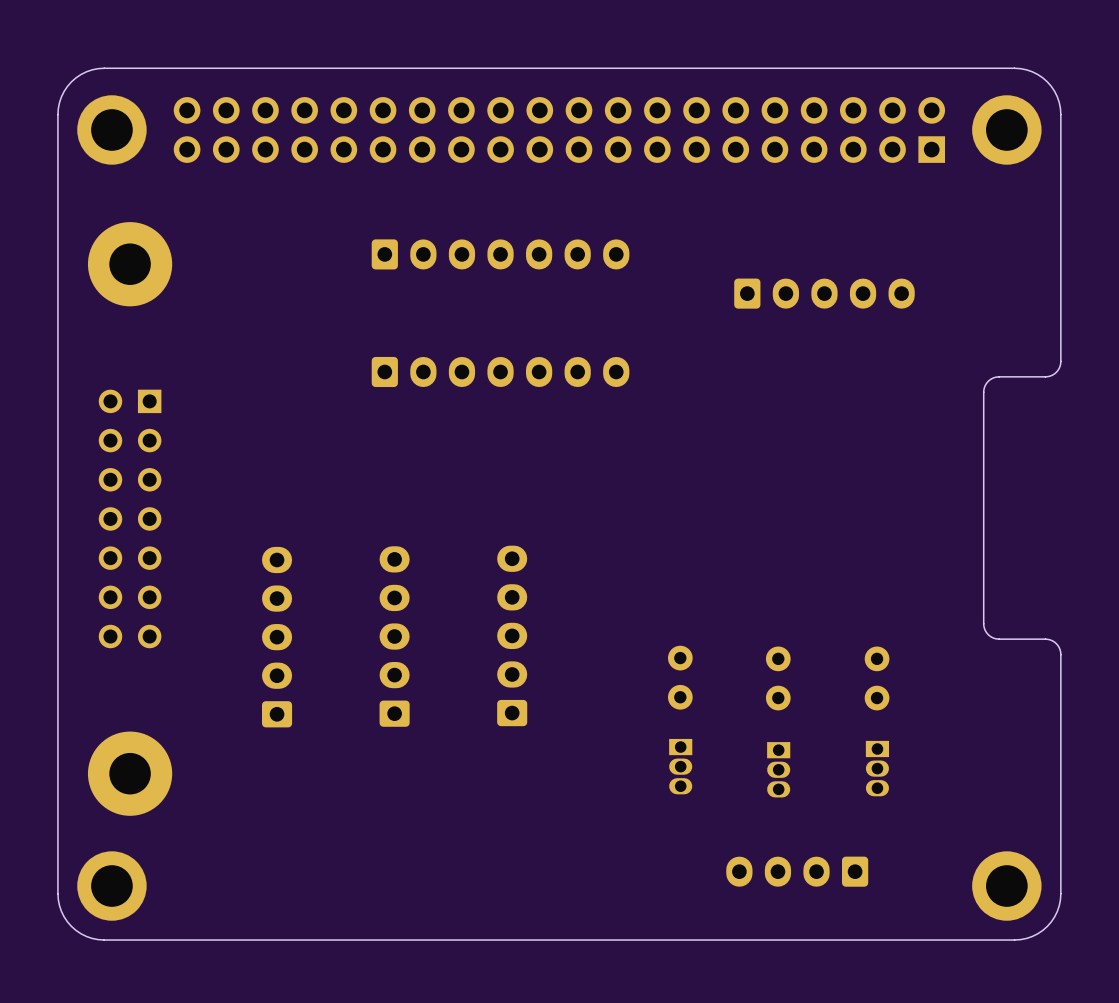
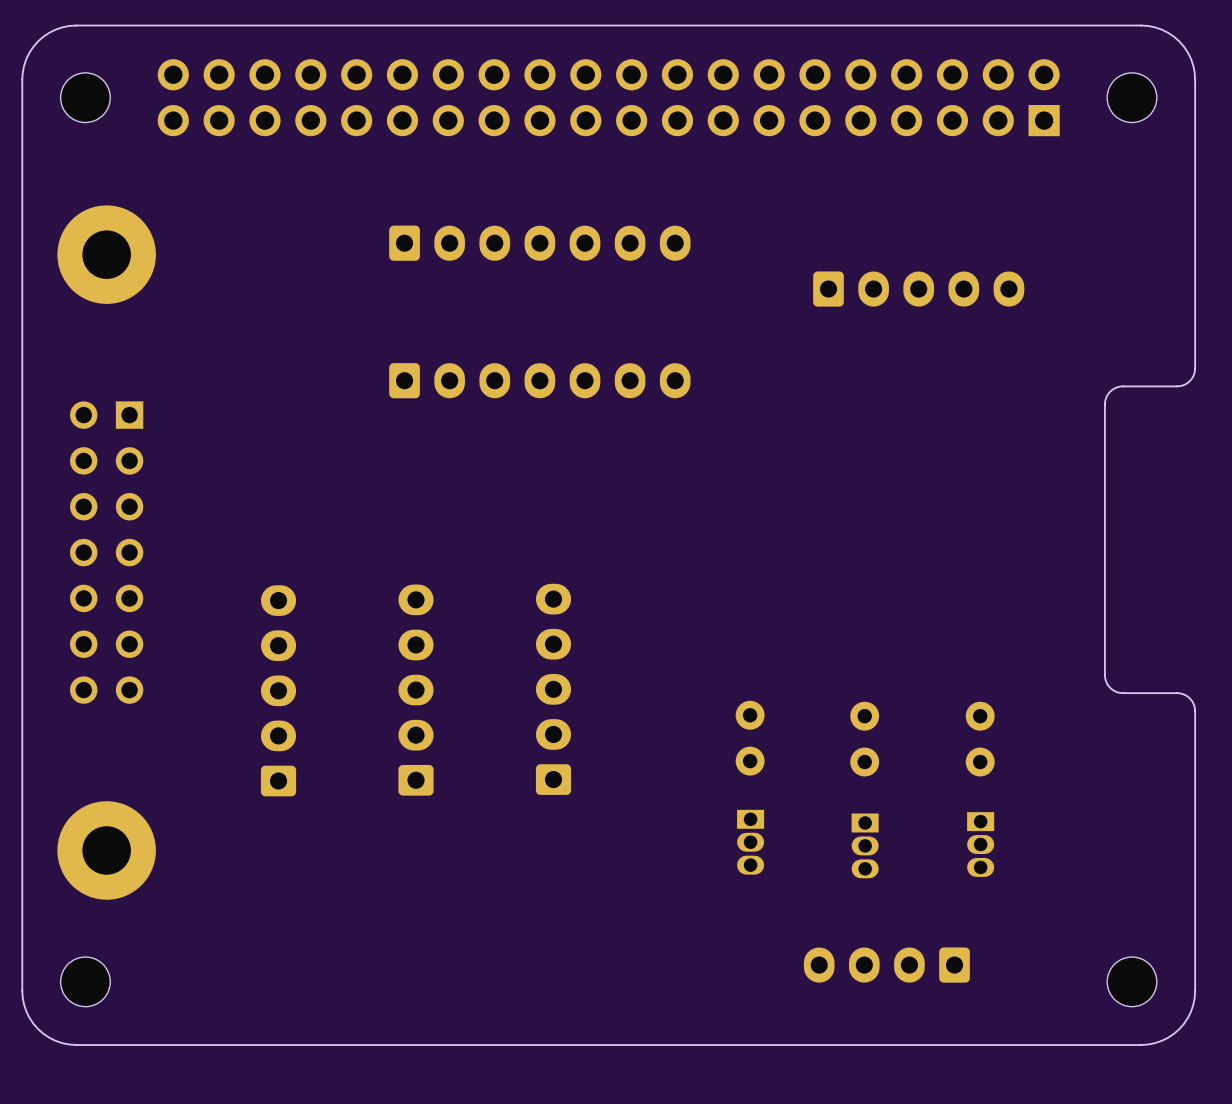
part footprint: [77, 95, 147, 165] -> [60, 72, 111, 123]
part footprint: [972, 95, 1042, 165] -> [1107, 72, 1157, 123]
part footprint: [77, 851, 147, 921] -> [60, 957, 111, 1007]
part footprint: [972, 851, 1042, 921] -> [1107, 957, 1157, 1007]

